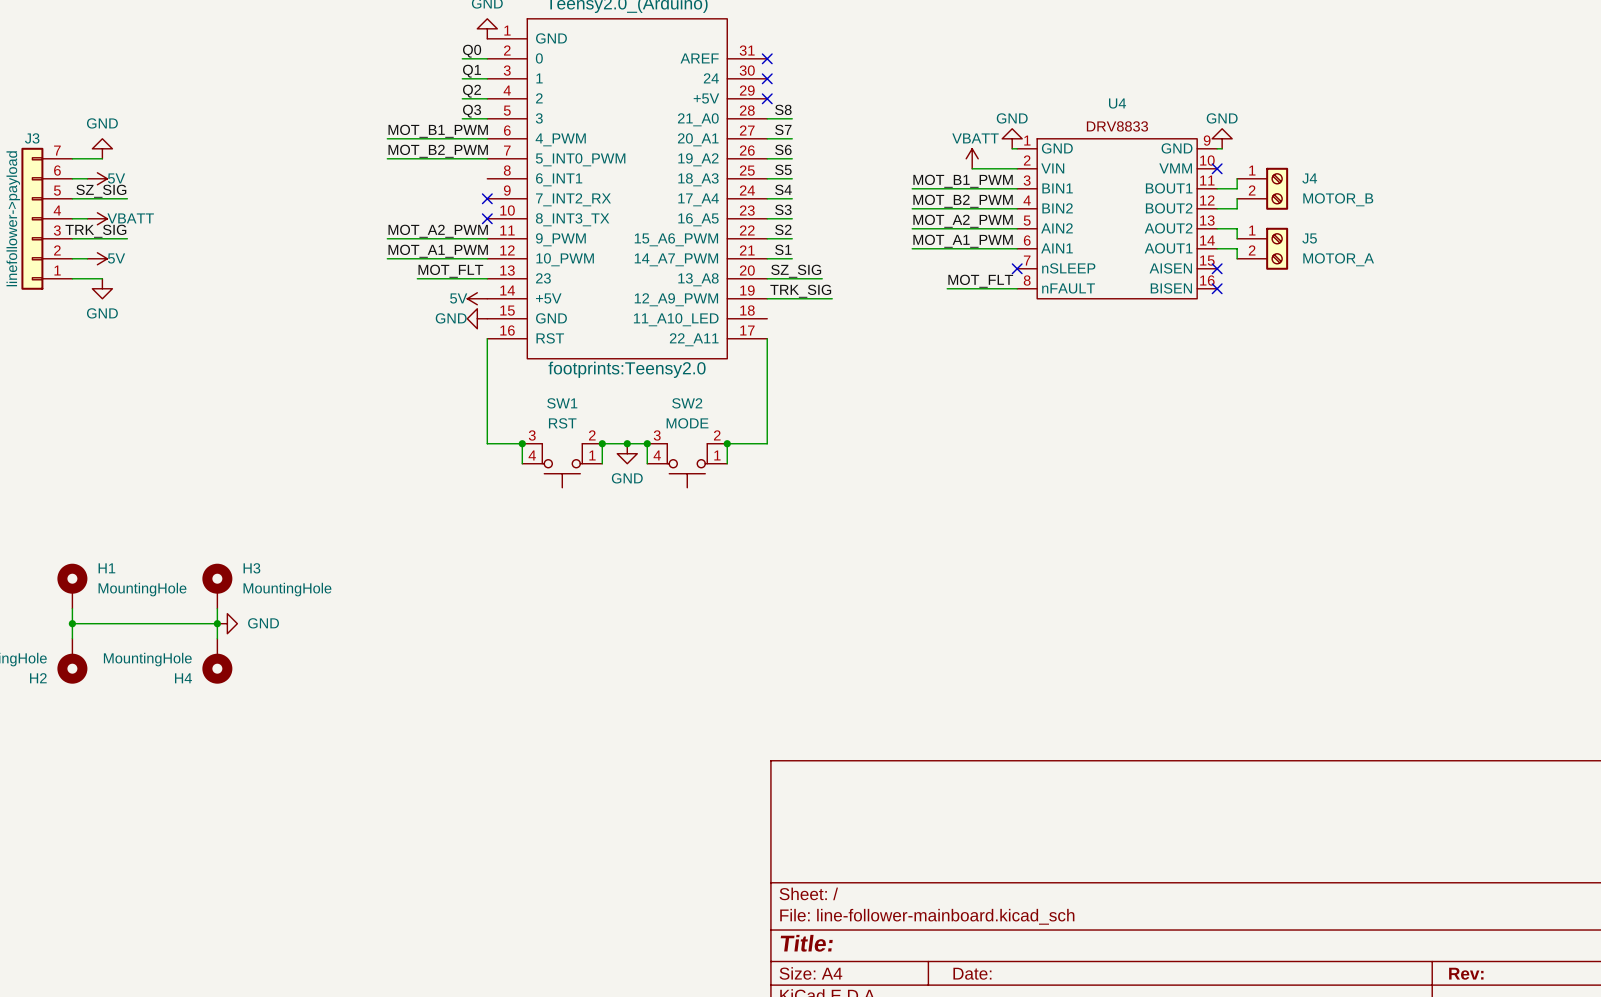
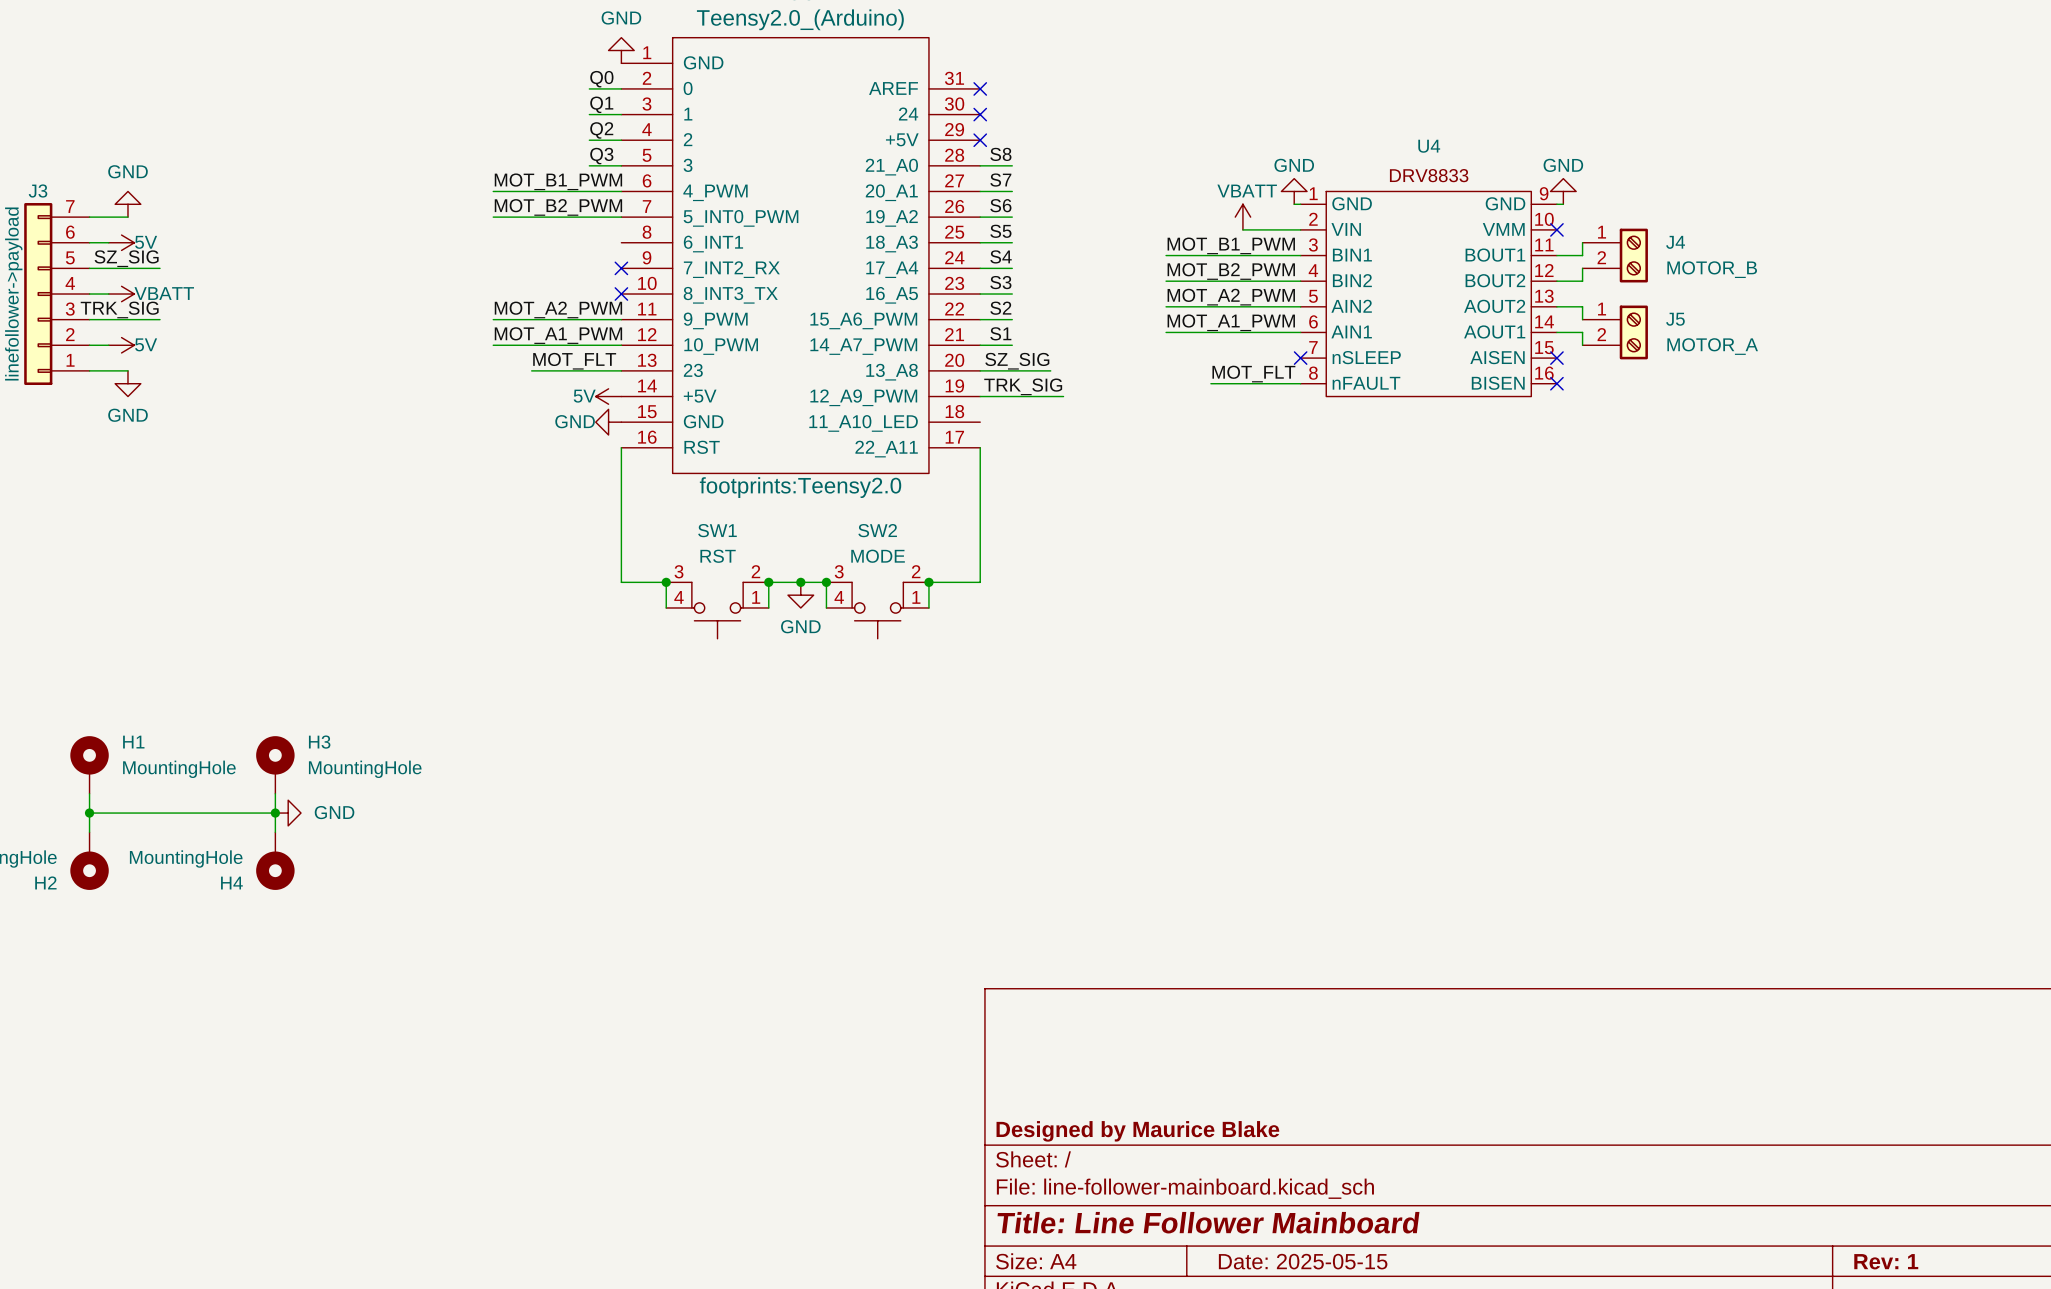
title block: none -> Designed by Maurice Blake (1137, 1131)
title block: Title: (806, 943) -> Title: Line Follower Mainboard (1208, 1222)
title block: Date: (972, 973) -> Date: 2025-05-15 (1303, 1261)
title block: Rev: (1466, 973) -> Rev: 1 (1886, 1261)

